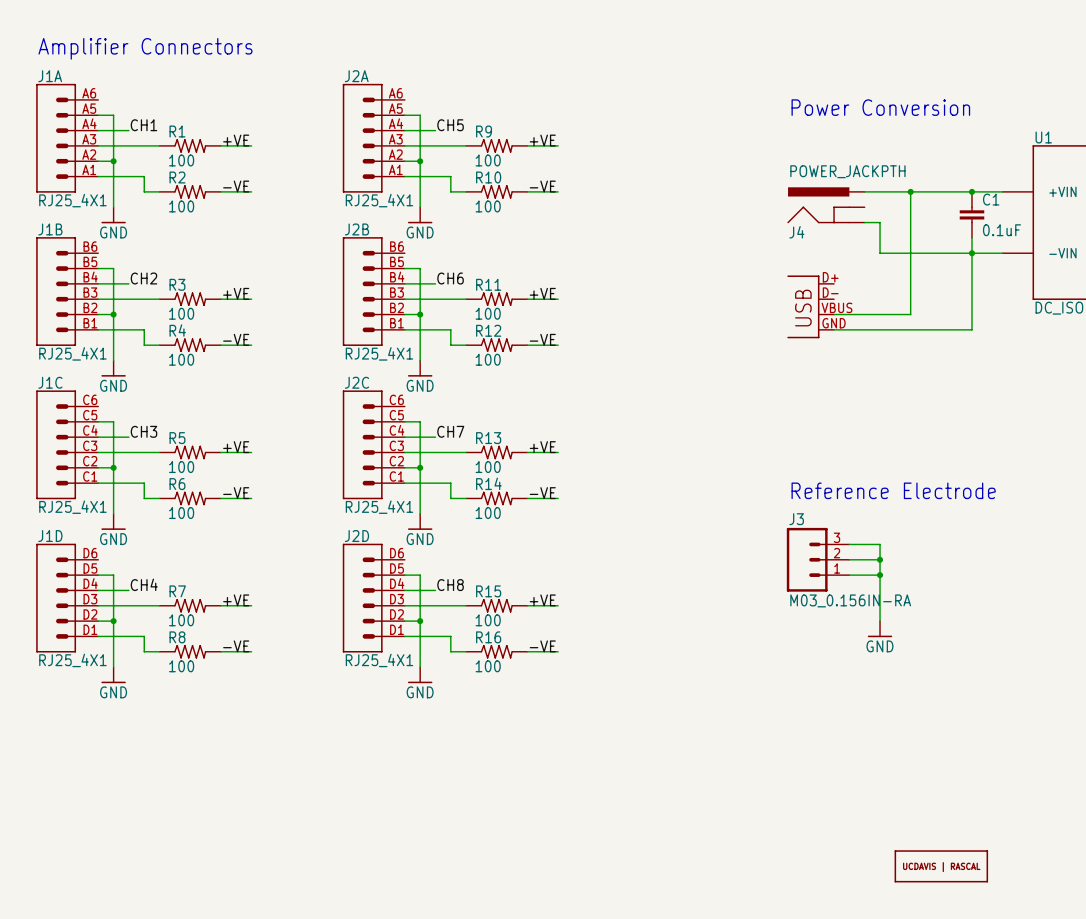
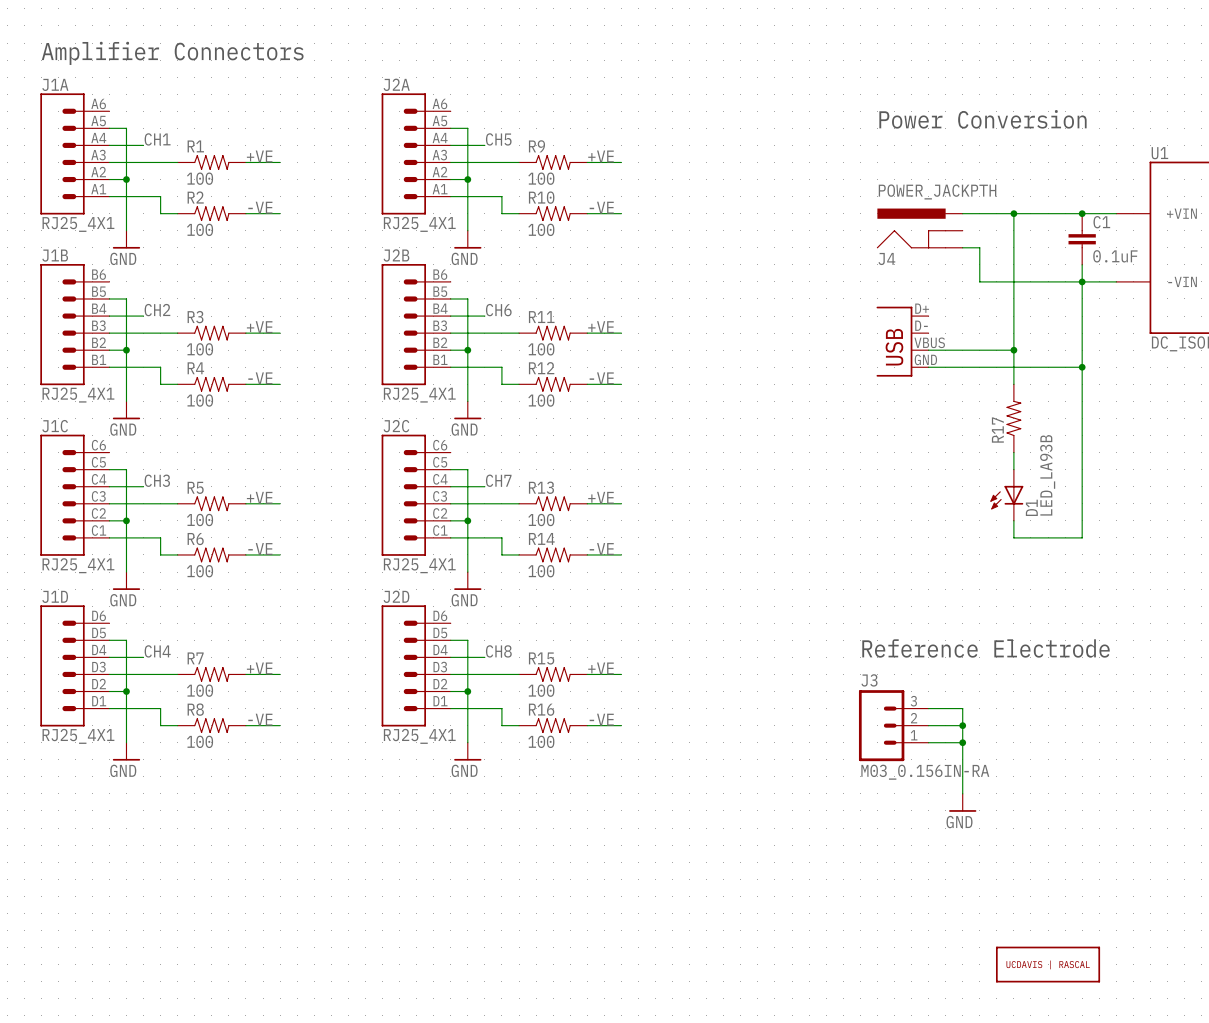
wire: none -> (1013, 350) (1013, 384)
junction: none -> (1013, 350)
wire: none -> (1082, 367) (1082, 537) (1013, 537) (1013, 520)
junction: none -> (1082, 367)
R17: none -> (1013, 418)
wire: none -> (1013, 452) (1013, 469)
D1: none -> LED_LA93B (1006, 495)
text position: Reference Electrode (893, 490) -> Reference Electrode (986, 648)
wire: (849, 544) (880, 544) (880, 621) -> (928, 708) (962, 708) (962, 793)
J3 position: (818, 559) -> (893, 725)
wire: (849, 559) (880, 559) -> (928, 725) (962, 725)
junction: (880, 559) -> none
wire: (849, 575) (880, 575) -> (928, 742) (962, 742)
junction: (880, 575) -> none
power symbol position: GND (880, 629) -> GND (962, 802)
junction: none -> (962, 725)
junction: none -> (962, 742)

